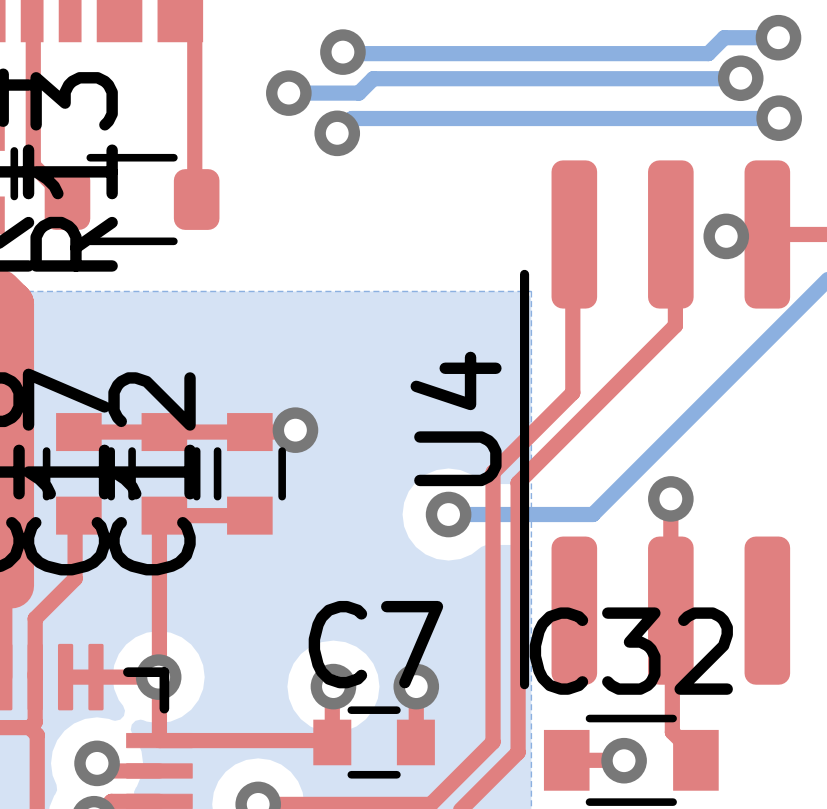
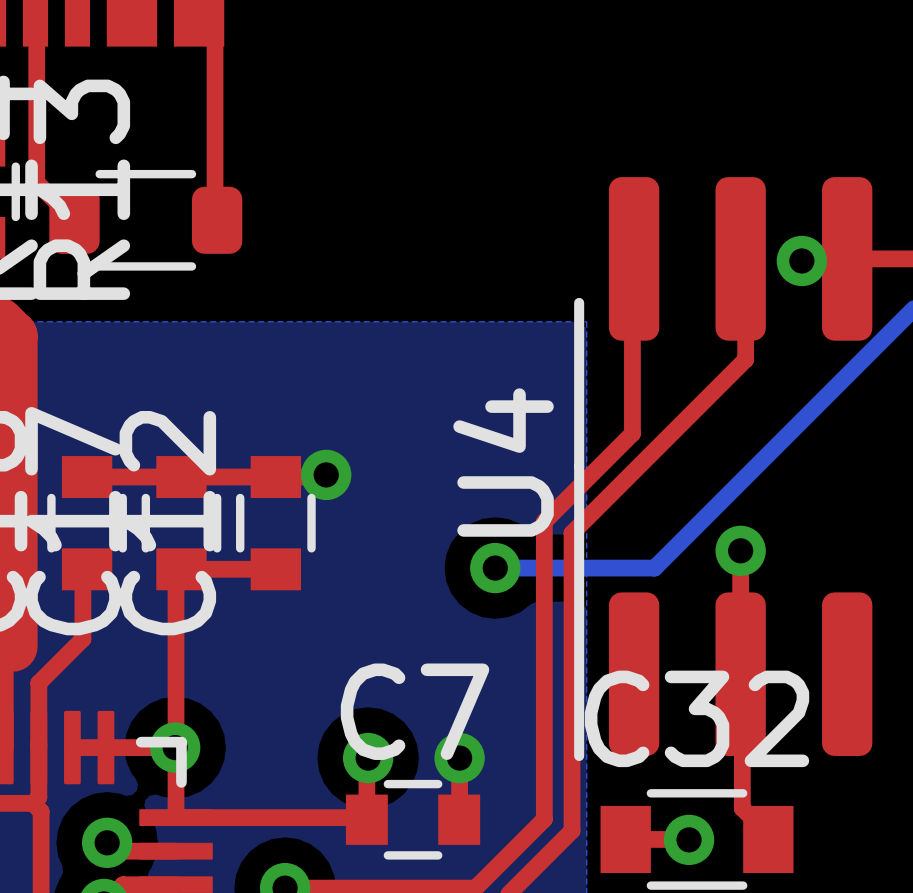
bottom track: (778, 37) (724, 37) (708, 53) (344, 53) (342, 52) -> none
via: (778, 37) -> none
via: (342, 52) -> none
bottom track: (740, 78) (373, 78) (358, 93) (288, 93) -> none
via: (740, 78) -> none
via: (288, 93) -> none
bottom track: (778, 118) (352, 118) (337, 133) -> none
via: (779, 118) -> none
via: (337, 133) -> none

